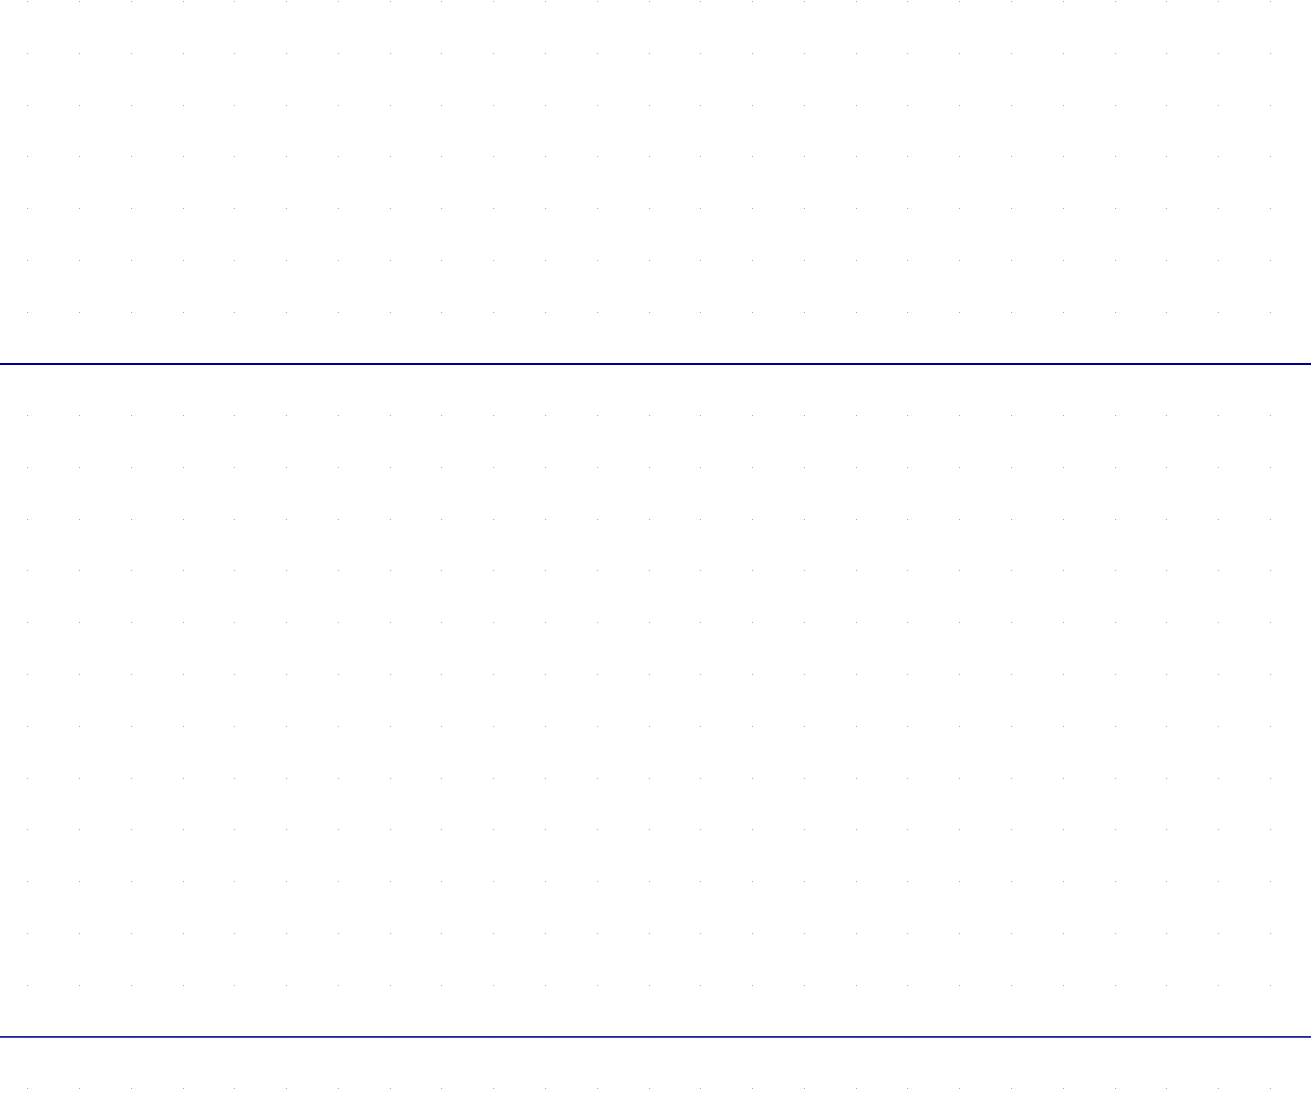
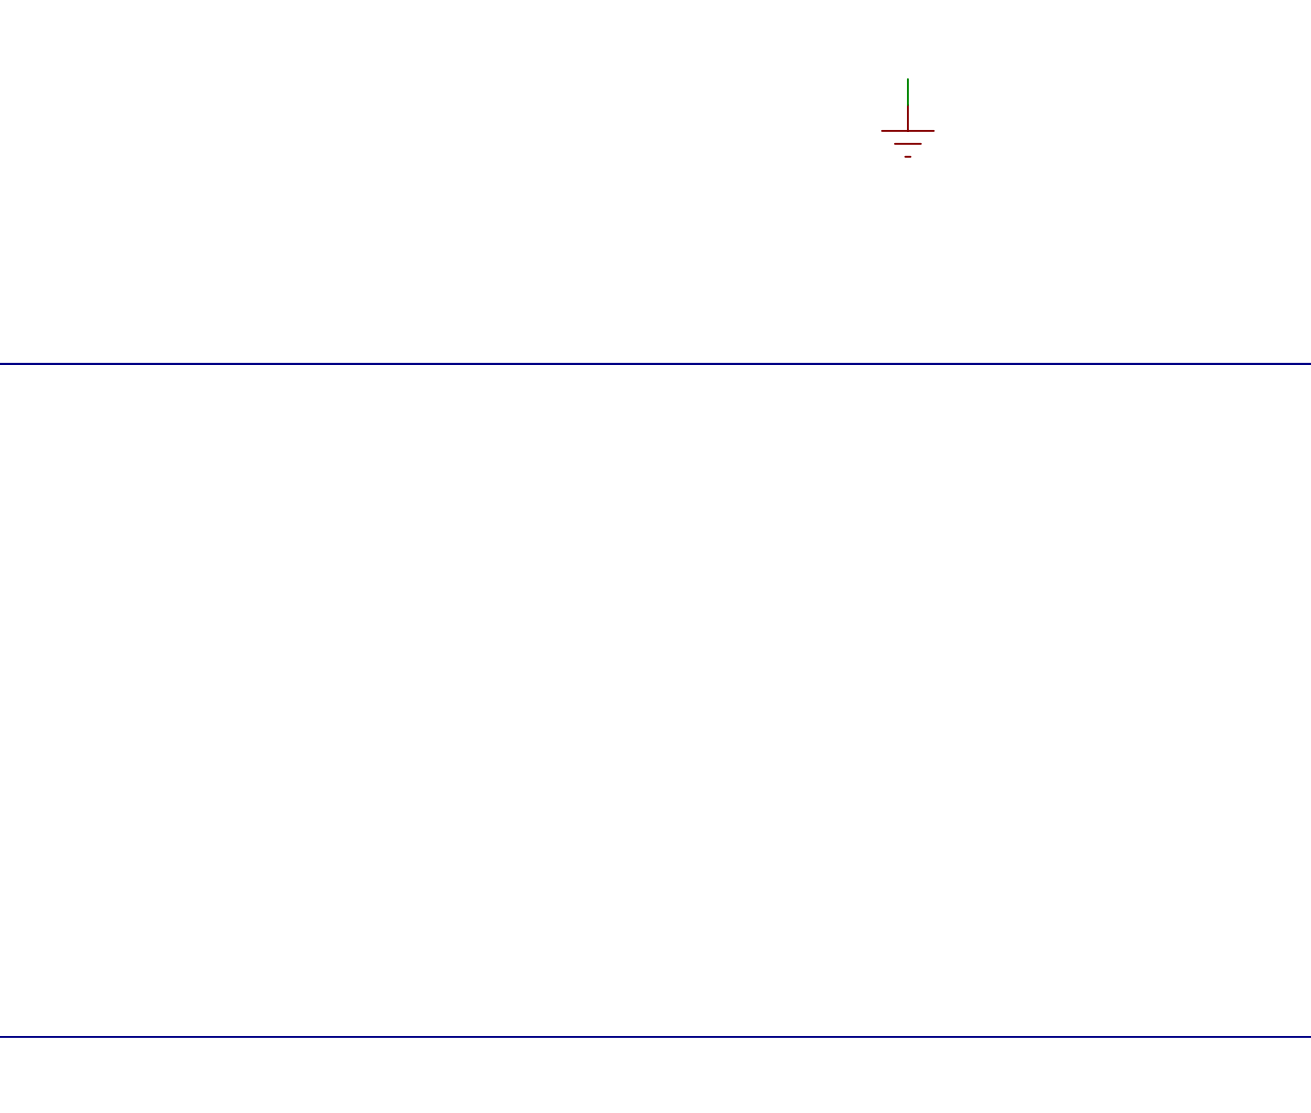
wire: none -> (907, 79) (907, 105)
power symbol: none -> (907, 130)

